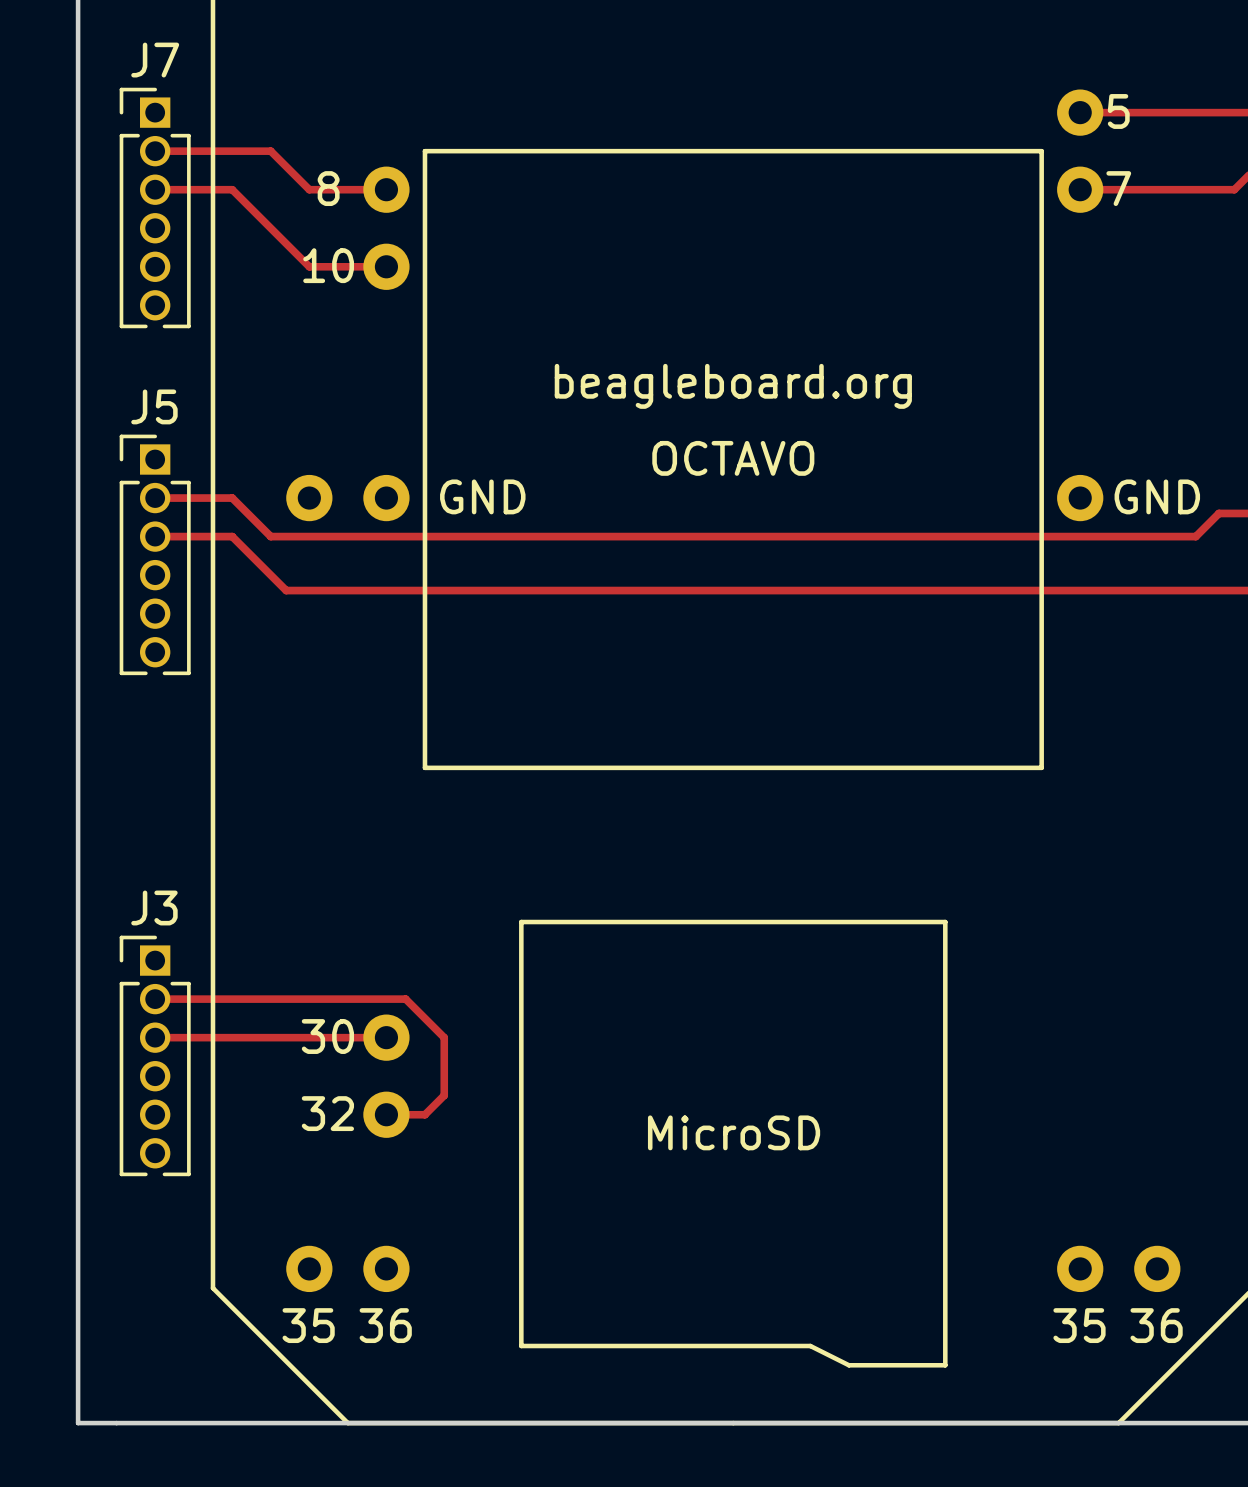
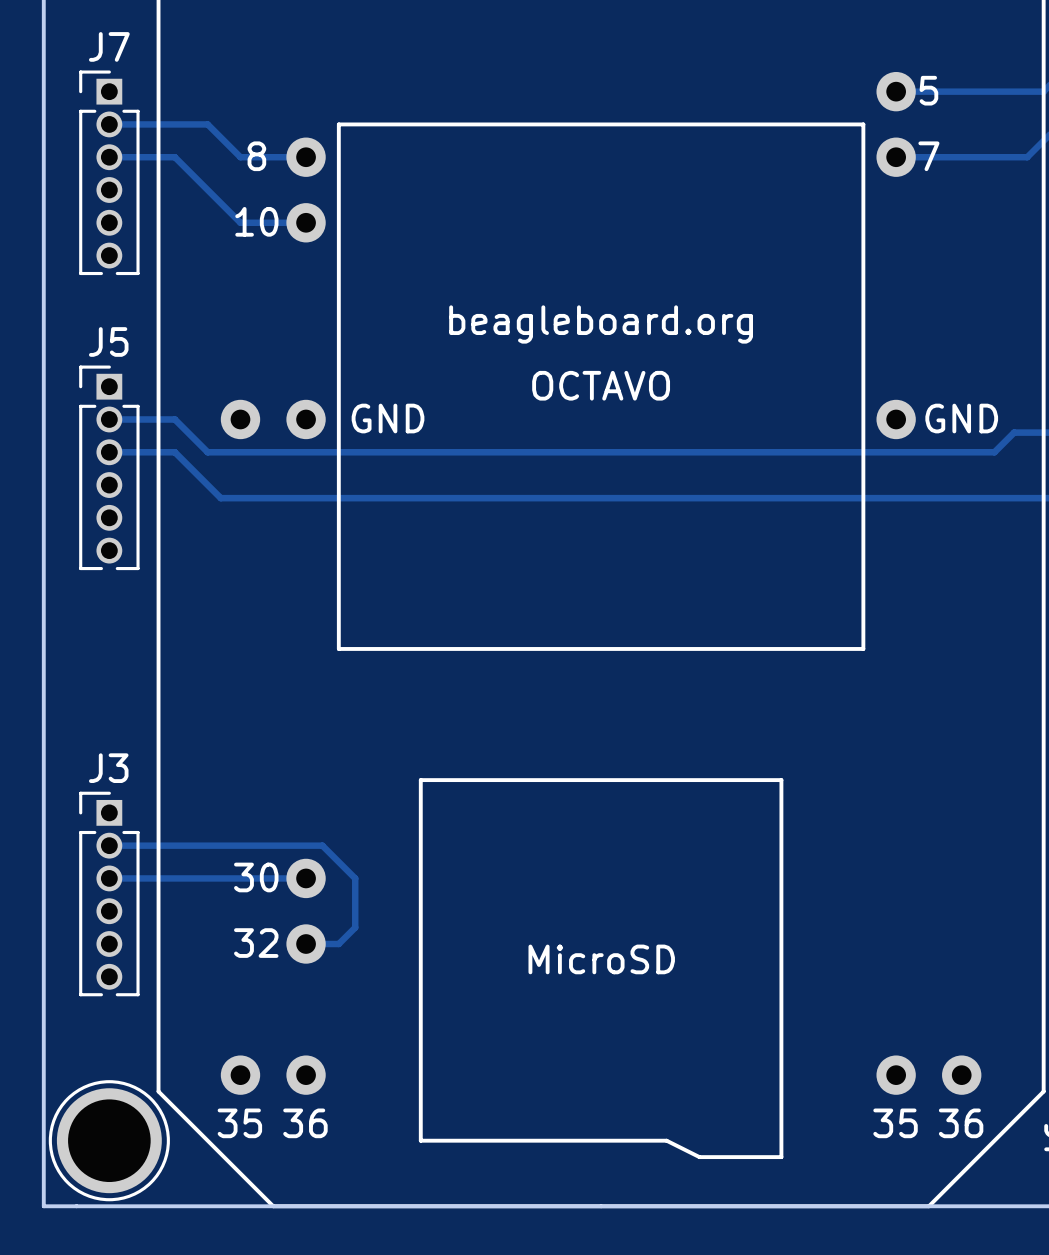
part: none -> (109, 1140)

